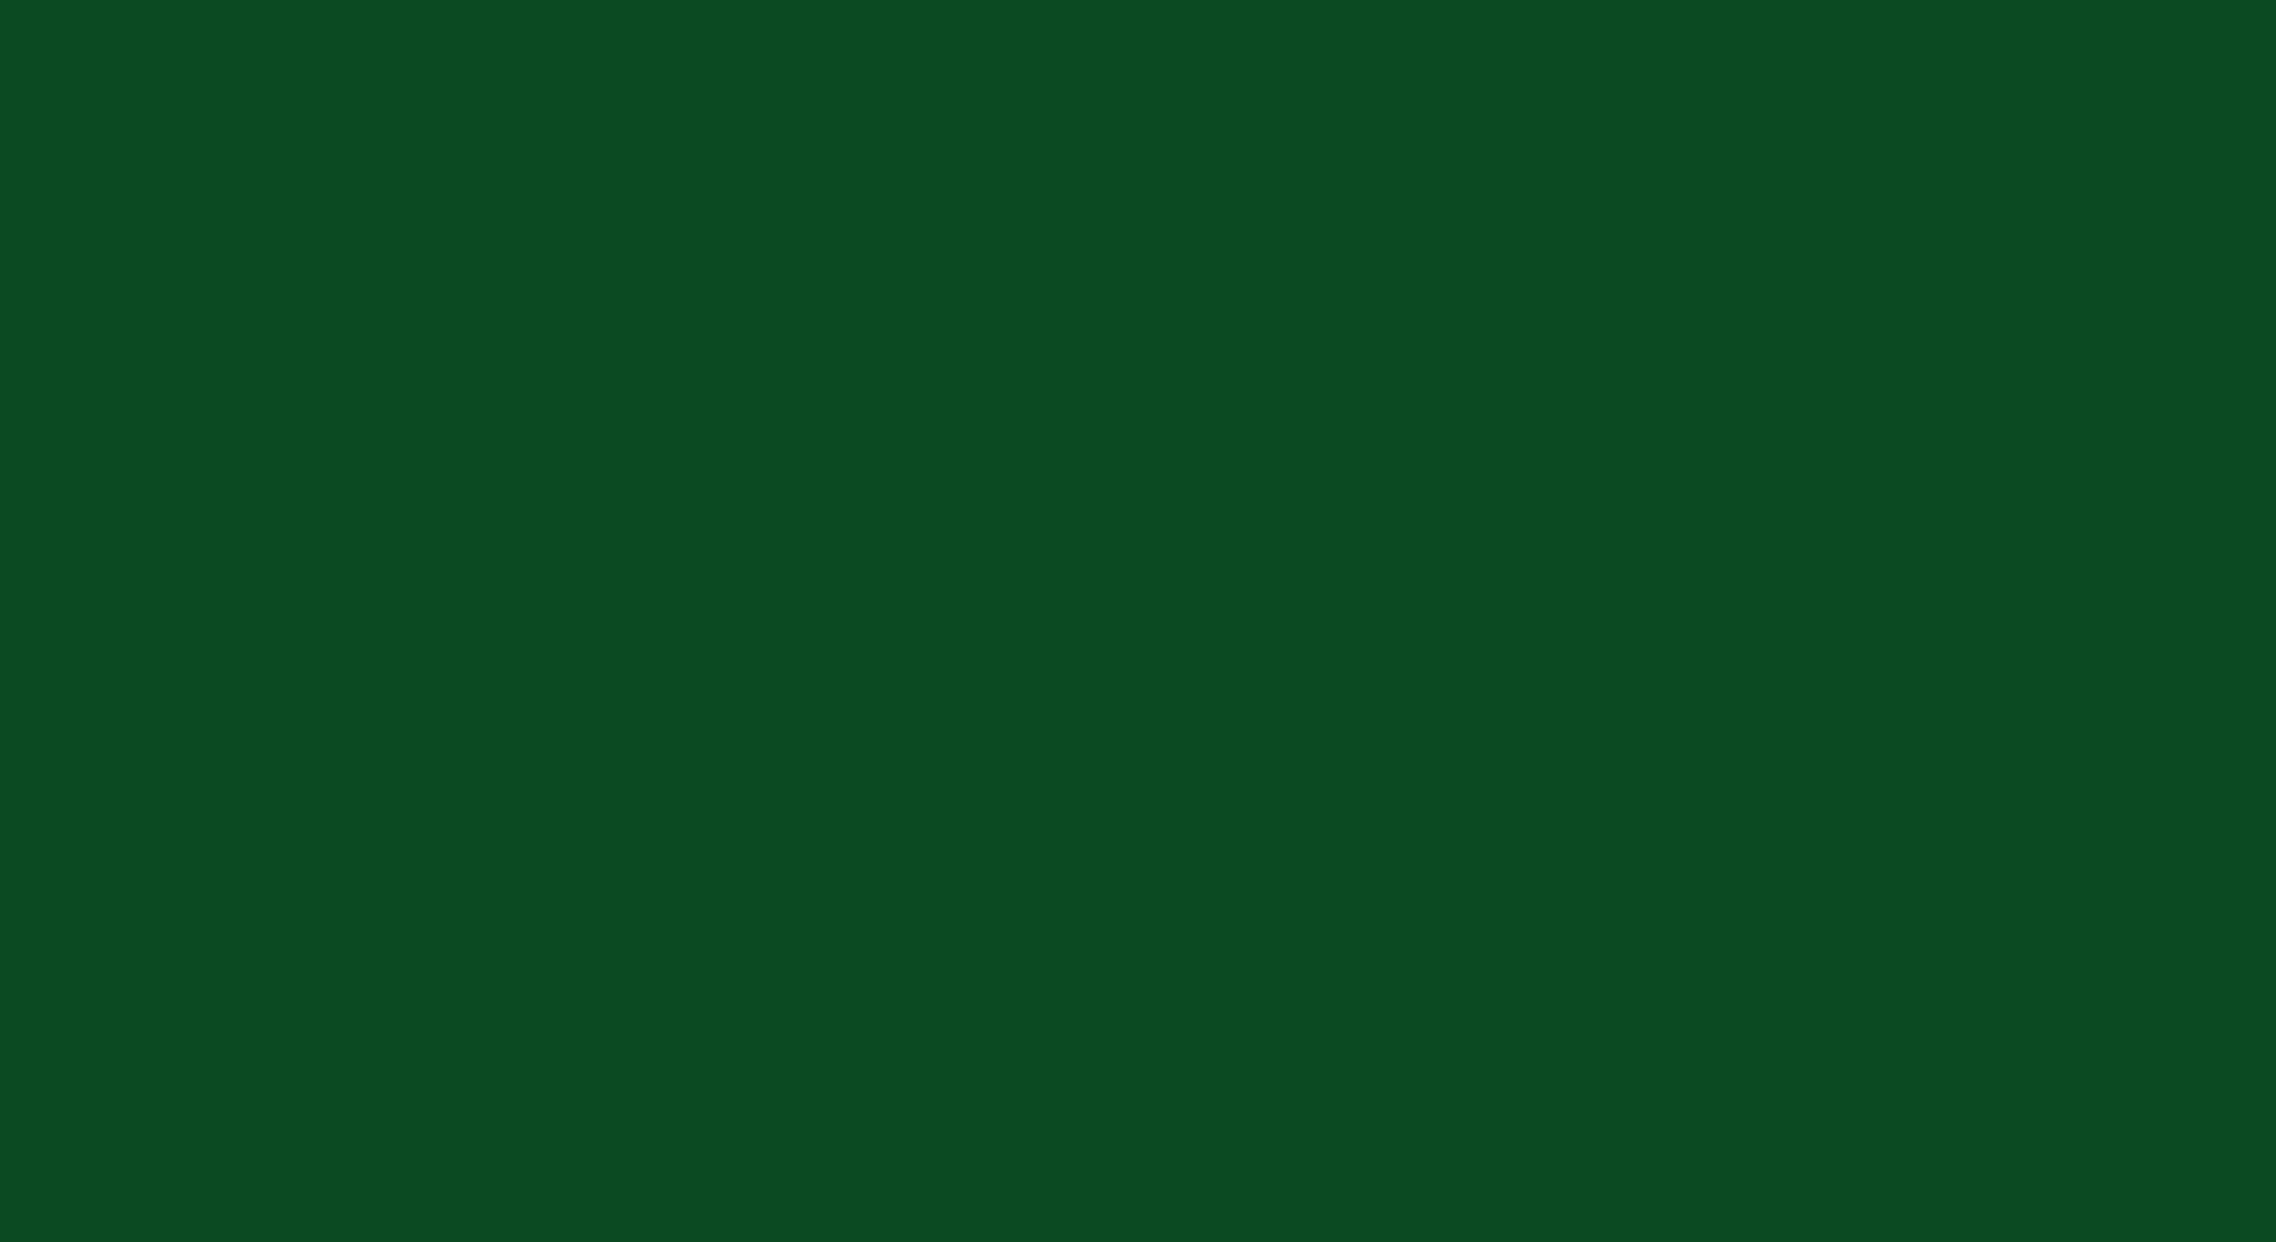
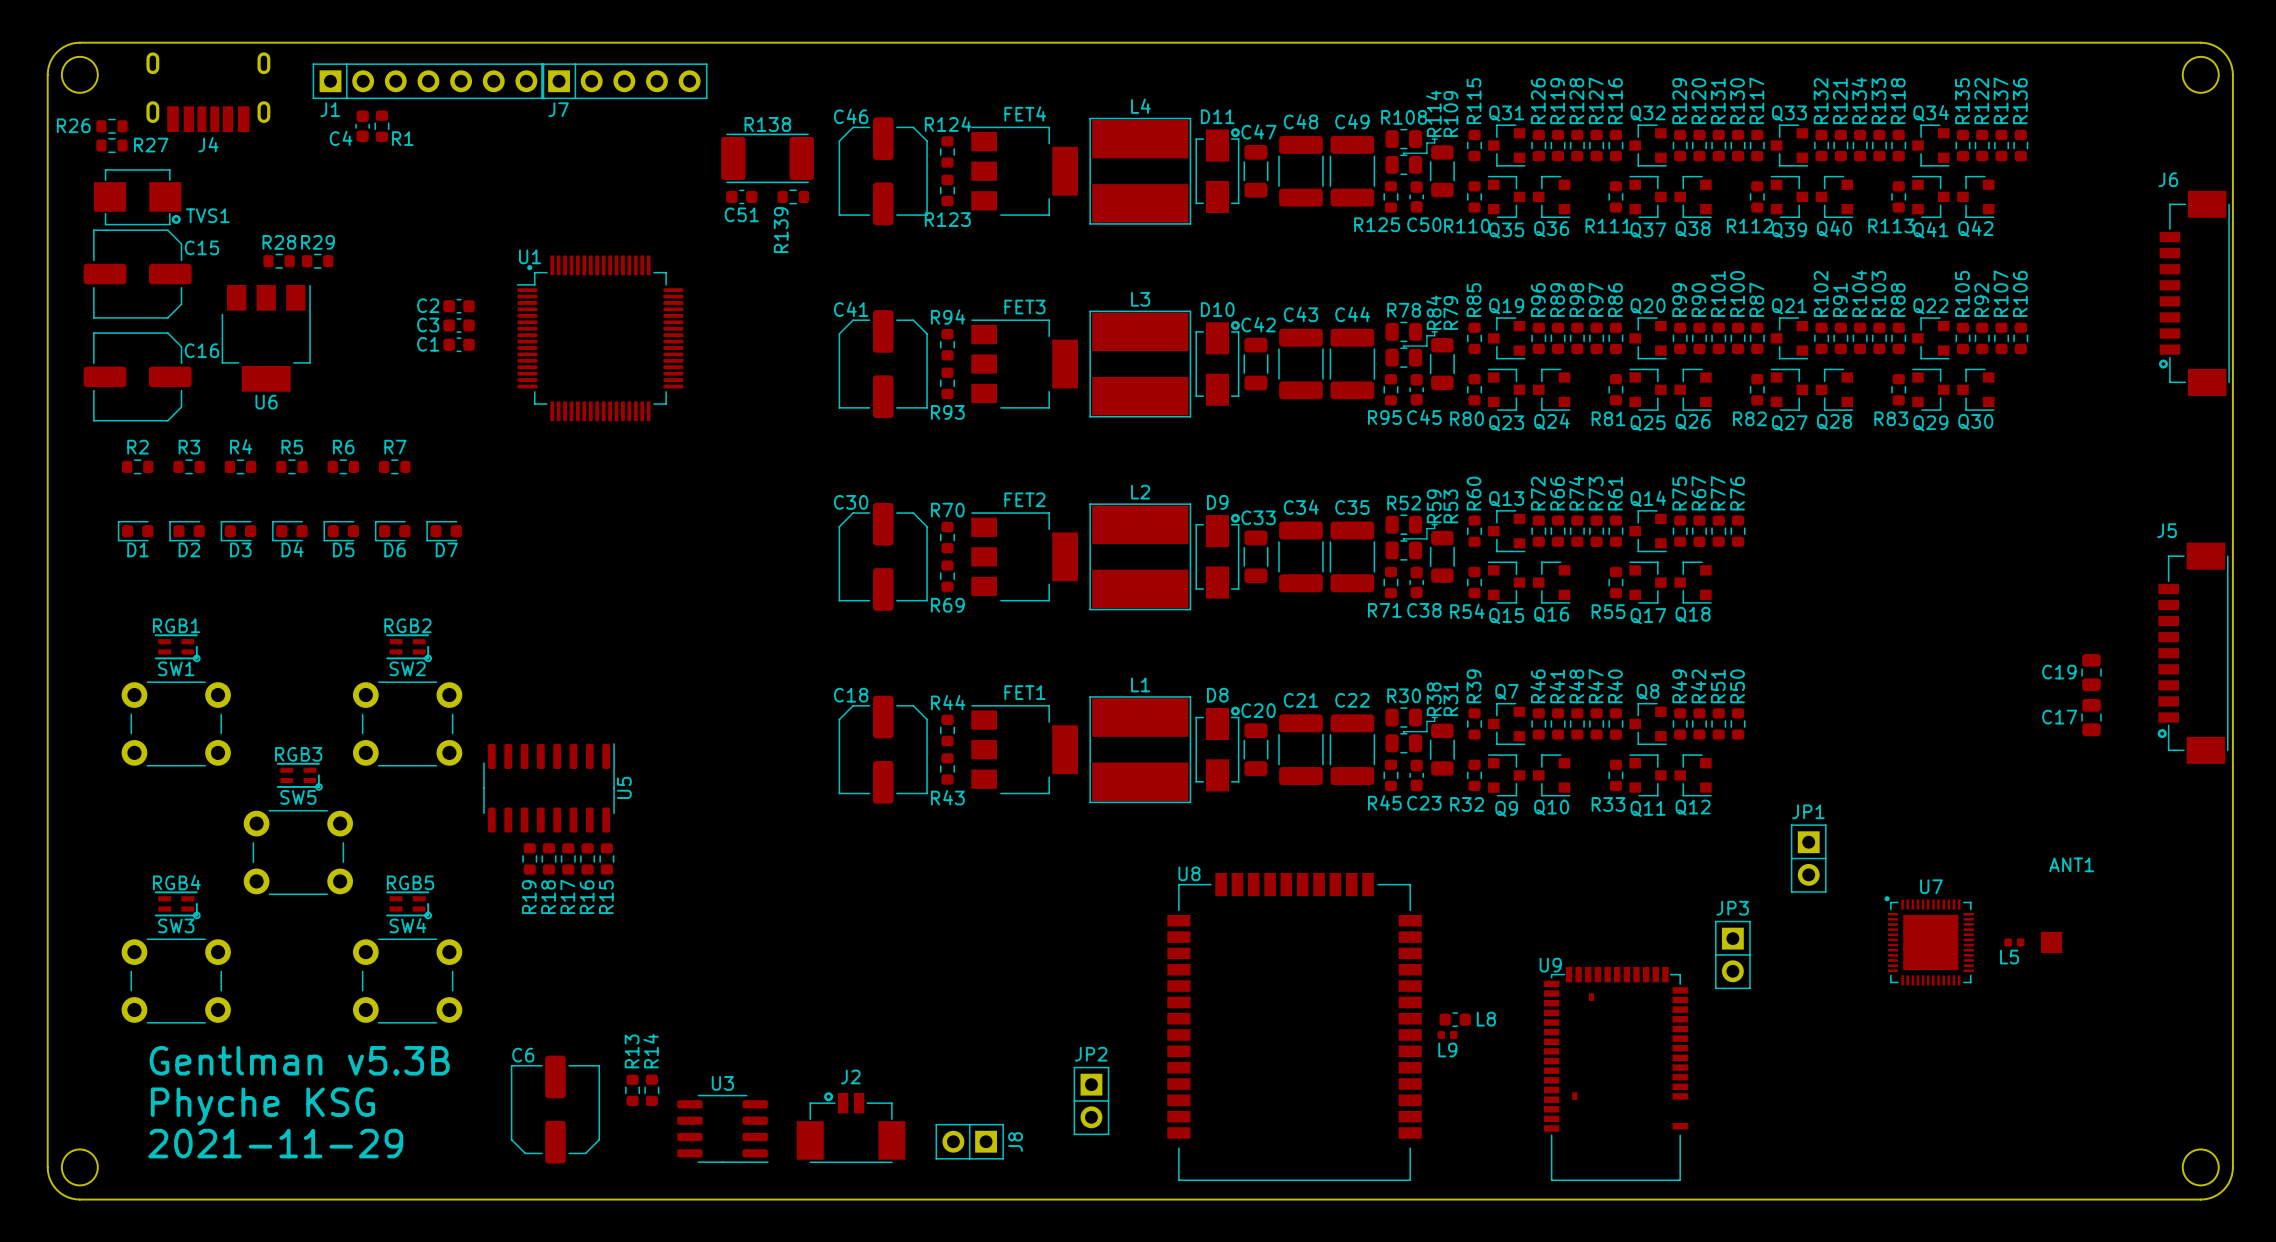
board edge: none -> (79, 42) (2200, 42) (2216, 47) (2228, 58) (2232, 74) (2232, 1167) (2228, 1183) (2216, 1195) (2200, 1199) (79, 1199) (63, 1195) (52, 1183) (47, 1167) (47, 74) (50, 62) (57, 52) (67, 45) (79, 42)
round board edge: none -> [60, 55, 99, 94]
round board edge: none -> [2181, 55, 2220, 94]
J1: none -> (428, 81)
J7: none -> (624, 81)
J4: none -> (208, 92)
R26: none -> (111, 126)
C4: none -> (362, 126)
R1: none -> (381, 126)
R108: none -> (1403, 139)
line: none -> (1432, 139) (1437, 139)
line: none -> (1434, 139) (1434, 142) (1426, 142) (1426, 153) (1403, 154)
R27: none -> (111, 145)
R115: none -> (1474, 145)
Q35: none -> (1506, 145)
R126: none -> (1538, 145)
R119: none -> (1558, 145)
R128: none -> (1577, 145)
R127: none -> (1596, 145)
R116: none -> (1615, 145)
Q37: none -> (1648, 145)
R129: none -> (1680, 145)
R120: none -> (1699, 145)
R131: none -> (1718, 145)
R130: none -> (1738, 145)
R117: none -> (1757, 145)
Q39: none -> (1789, 145)
R132: none -> (1821, 145)
R121: none -> (1840, 145)
R134: none -> (1860, 145)
R133: none -> (1879, 145)
R118: none -> (1898, 145)
Q41: none -> (1930, 145)
R135: none -> (1962, 145)
R122: none -> (1982, 145)
R137: none -> (2001, 145)
R136: none -> (2020, 145)
R124: none -> (947, 151)
R138: none -> (767, 158)
R114: none -> (1403, 164)
D11: none -> (1217, 170)
C46: none -> (883, 171)
FET4: none -> (1024, 171)
L4: none -> (1140, 171)
C47: none -> (1255, 171)
C48: none -> (1300, 171)
C49: none -> (1352, 171)
R109: none -> (1442, 171)
R123: none -> (947, 190)
C51: none -> (741, 196)
R139: none -> (793, 196)
R125: none -> (1390, 196)
C50: none -> (1416, 196)
R110: none -> (1474, 196)
Q31: none -> (1506, 196)
Q36: none -> (1551, 196)
R111: none -> (1615, 196)
Q32: none -> (1647, 196)
Q38: none -> (1693, 196)
R112: none -> (1757, 196)
Q33: none -> (1789, 196)
Q40: none -> (1834, 196)
R113: none -> (1898, 196)
Q34: none -> (1930, 196)
Q42: none -> (1975, 196)
TVS1: none -> (137, 197)
R28: none -> (279, 261)
R29: none -> (317, 261)
C15: none -> (137, 274)
J6: none -> (2194, 293)
C2: none -> (459, 306)
C3: none -> (459, 325)
R78: none -> (1403, 331)
line: none -> (1432, 331) (1437, 331)
line: none -> (1434, 331) (1434, 335) (1426, 335) (1426, 346) (1403, 347)
U6: none -> (266, 338)
U1: none -> (600, 338)
R85: none -> (1474, 338)
Q23: none -> (1506, 338)
R96: none -> (1538, 338)
R89: none -> (1558, 338)
R98: none -> (1577, 338)
R97: none -> (1596, 338)
R86: none -> (1615, 338)
Q25: none -> (1648, 338)
R99: none -> (1680, 338)
R90: none -> (1699, 338)
R101: none -> (1718, 338)
R100: none -> (1738, 338)
R87: none -> (1757, 338)
Q27: none -> (1789, 338)
R102: none -> (1821, 338)
R91: none -> (1840, 338)
R104: none -> (1860, 338)
R103: none -> (1879, 338)
R88: none -> (1898, 338)
Q29: none -> (1930, 338)
R105: none -> (1962, 338)
R92: none -> (1982, 338)
R107: none -> (2001, 338)
R106: none -> (2020, 338)
C1: none -> (459, 344)
R94: none -> (947, 344)
R84: none -> (1403, 357)
D10: none -> (1217, 363)
C41: none -> (883, 364)
FET3: none -> (1024, 364)
L3: none -> (1140, 364)
C42: none -> (1255, 364)
C43: none -> (1300, 364)
C44: none -> (1352, 364)
R79: none -> (1442, 364)
C16: none -> (137, 376)
R93: none -> (947, 383)
R95: none -> (1390, 389)
C45: none -> (1416, 389)
R80: none -> (1474, 389)
Q19: none -> (1506, 389)
Q24: none -> (1551, 389)
R81: none -> (1615, 389)
Q20: none -> (1647, 389)
Q26: none -> (1693, 389)
R82: none -> (1757, 389)
Q21: none -> (1789, 389)
Q28: none -> (1834, 389)
R83: none -> (1898, 389)
Q22: none -> (1930, 389)
Q30: none -> (1975, 389)
R2: none -> (137, 466)
R3: none -> (189, 466)
R4: none -> (240, 466)
R5: none -> (291, 466)
R6: none -> (343, 466)
R7: none -> (394, 466)
R52: none -> (1403, 524)
line: none -> (1432, 524) (1437, 524)
line: none -> (1434, 524) (1434, 528) (1426, 528) (1426, 538) (1403, 540)
D1: none -> (135, 531)
D2: none -> (187, 531)
D3: none -> (238, 531)
D4: none -> (289, 531)
D5: none -> (341, 531)
D6: none -> (392, 531)
D7: none -> (444, 531)
R60: none -> (1474, 531)
Q15: none -> (1506, 531)
R72: none -> (1538, 531)
R66: none -> (1558, 531)
R74: none -> (1577, 531)
R73: none -> (1596, 531)
R61: none -> (1615, 531)
Q17: none -> (1648, 531)
R75: none -> (1680, 531)
R67: none -> (1699, 531)
R77: none -> (1718, 531)
R76: none -> (1738, 531)
R70: none -> (947, 537)
R59: none -> (1403, 550)
C30: none -> (883, 556)
FET2: none -> (1024, 556)
L2: none -> (1140, 556)
D9: none -> (1217, 556)
C33: none -> (1255, 556)
C34: none -> (1300, 556)
C35: none -> (1352, 556)
R53: none -> (1442, 556)
R69: none -> (947, 576)
R71: none -> (1390, 582)
C38: none -> (1416, 582)
R54: none -> (1474, 582)
Q13: none -> (1506, 582)
Q16: none -> (1551, 582)
R55: none -> (1615, 582)
Q14: none -> (1647, 582)
Q18: none -> (1693, 582)
RGB1: none -> (177, 648)
RGB2: none -> (409, 648)
J5: none -> (2193, 653)
C19: none -> (2091, 672)
R30: none -> (1403, 717)
line: none -> (1432, 717) (1437, 717)
line: none -> (1434, 717) (1434, 721) (1426, 721) (1426, 731) (1403, 732)
C17: none -> (2091, 717)
SW1: none -> (176, 723)
SW2: none -> (407, 723)
R39: none -> (1474, 723)
Q9: none -> (1506, 723)
R46: none -> (1538, 723)
R41: none -> (1558, 723)
R48: none -> (1577, 723)
R47: none -> (1596, 723)
R40: none -> (1615, 723)
Q11: none -> (1648, 723)
R49: none -> (1680, 723)
R42: none -> (1699, 723)
R51: none -> (1718, 723)
R50: none -> (1738, 723)
R44: none -> (947, 730)
R38: none -> (1403, 743)
C18: none -> (883, 749)
FET1: none -> (1024, 749)
L1: none -> (1140, 749)
D8: none -> (1217, 749)
C20: none -> (1255, 749)
C21: none -> (1300, 749)
C22: none -> (1352, 749)
R31: none -> (1442, 749)
R43: none -> (947, 768)
R45: none -> (1390, 775)
C23: none -> (1416, 775)
R32: none -> (1474, 775)
Q7: none -> (1506, 775)
Q10: none -> (1551, 775)
R33: none -> (1615, 775)
Q8: none -> (1647, 775)
Q12: none -> (1693, 775)
RGB3: none -> (299, 776)
U5: none -> (549, 787)
SW5: none -> (298, 852)
R19: none -> (529, 858)
R18: none -> (549, 858)
R17: none -> (568, 858)
R16: none -> (587, 858)
R15: none -> (606, 858)
JP1: none -> (1808, 858)
RGB4: none -> (177, 905)
RGB5: none -> (409, 905)
U7: none -> (1929, 940)
L5: none -> (2014, 942)
ANT1: none -> (2051, 942)
JP3: none -> (1732, 954)
SW3: none -> (176, 981)
SW4: none -> (407, 981)
L8: none -> (1455, 1019)
U8: none -> (1294, 1027)
L9: none -> (1447, 1035)
text: none -> Gentlman v5.3B (299, 1060)
U9: none -> (1615, 1073)
R13: none -> (632, 1090)
R14: none -> (651, 1090)
JP2: none -> (1091, 1100)
text: none -> Phyche KSG (262, 1106)
C6: none -> (555, 1109)
J2: none -> (851, 1127)
U3: none -> (722, 1128)
J8: none -> (969, 1141)
text: none -> 2021-11-29 (275, 1143)
round board edge: none -> [60, 1148, 99, 1187]
round board edge: none -> [2181, 1148, 2220, 1187]

